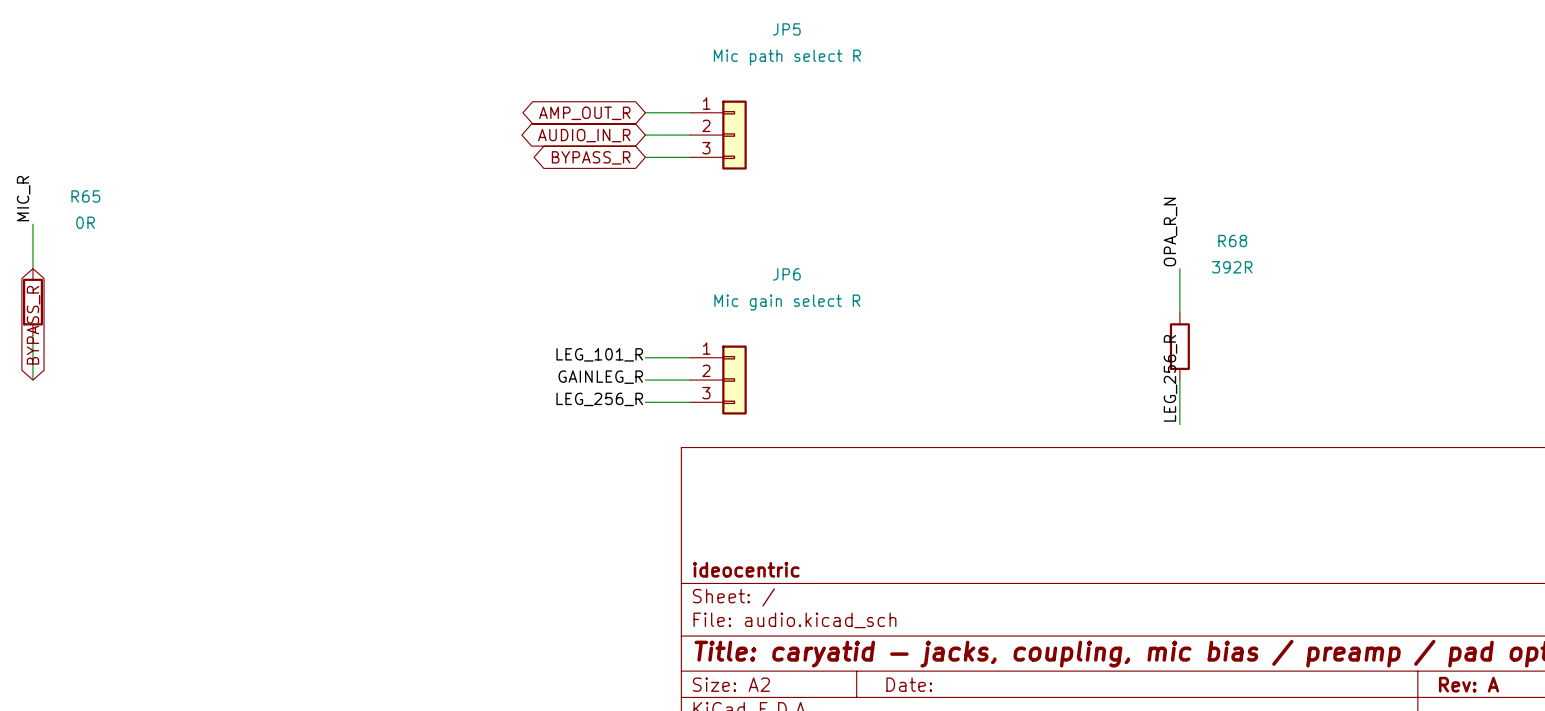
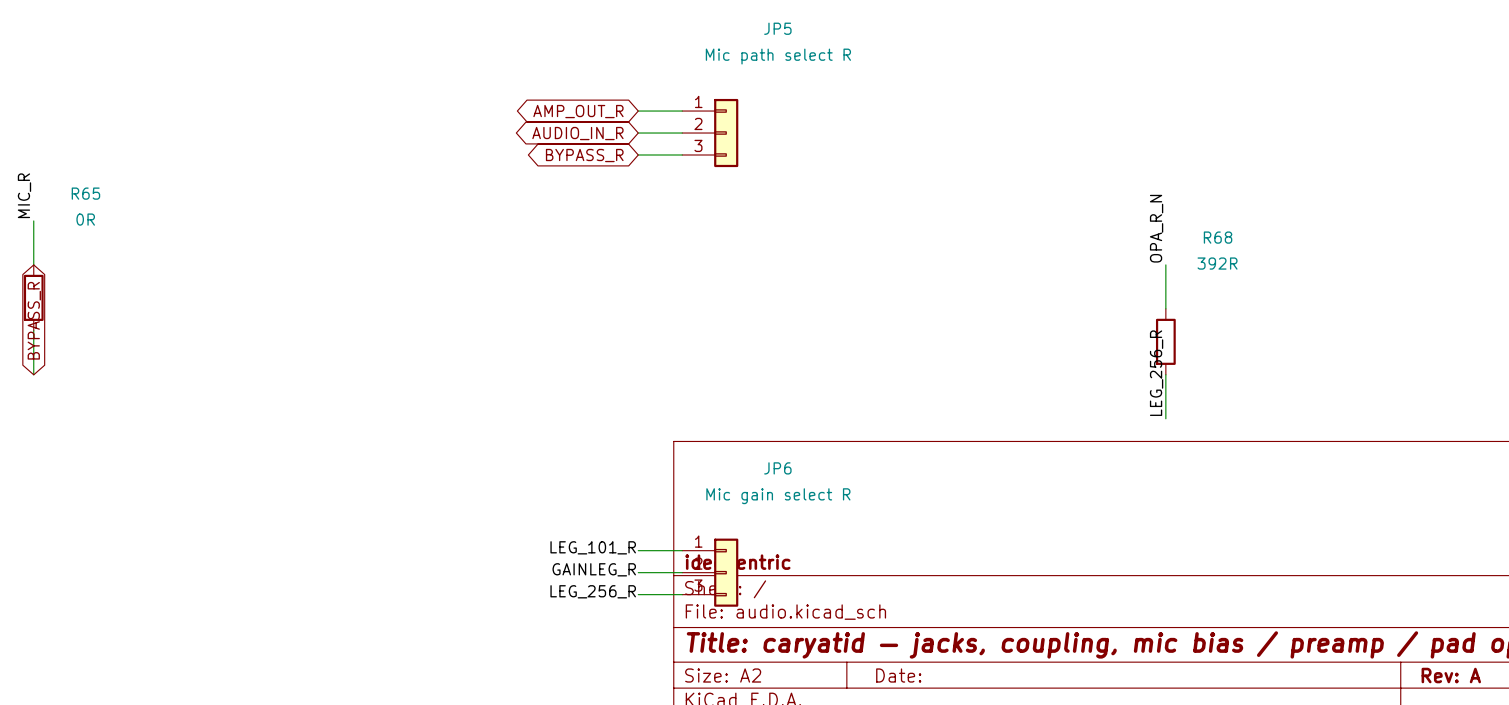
label position: LEG_101_R (599, 354) -> LEG_101_R (593, 547)
wire: (645, 357) (689, 357) -> (638, 550) (682, 550)
label position: GAINLEG_R (600, 377) -> GAINLEG_R (594, 569)
wire: (645, 380) (689, 380) -> (638, 572) (682, 572)
JP6 position: (718, 380) -> (710, 572)
label position: LEG_256_R (599, 399) -> LEG_256_R (593, 591)
wire: (645, 402) (689, 402) -> (638, 594) (682, 594)

